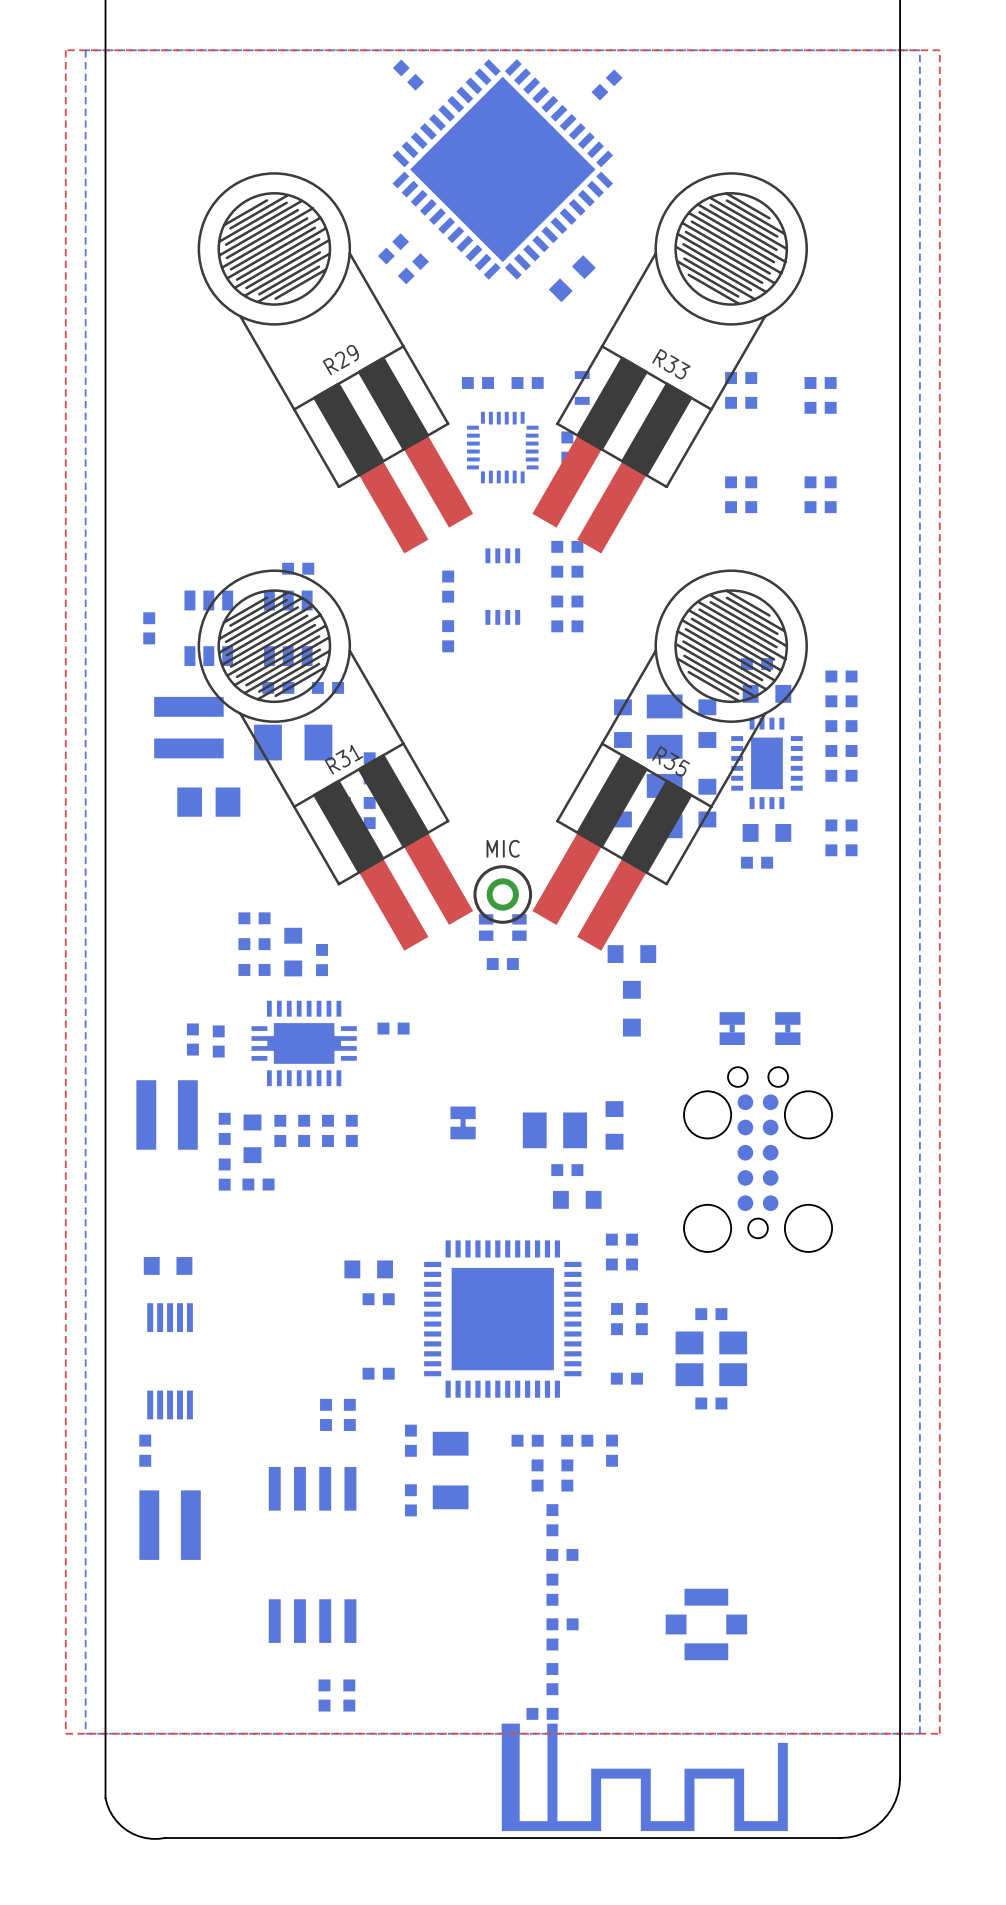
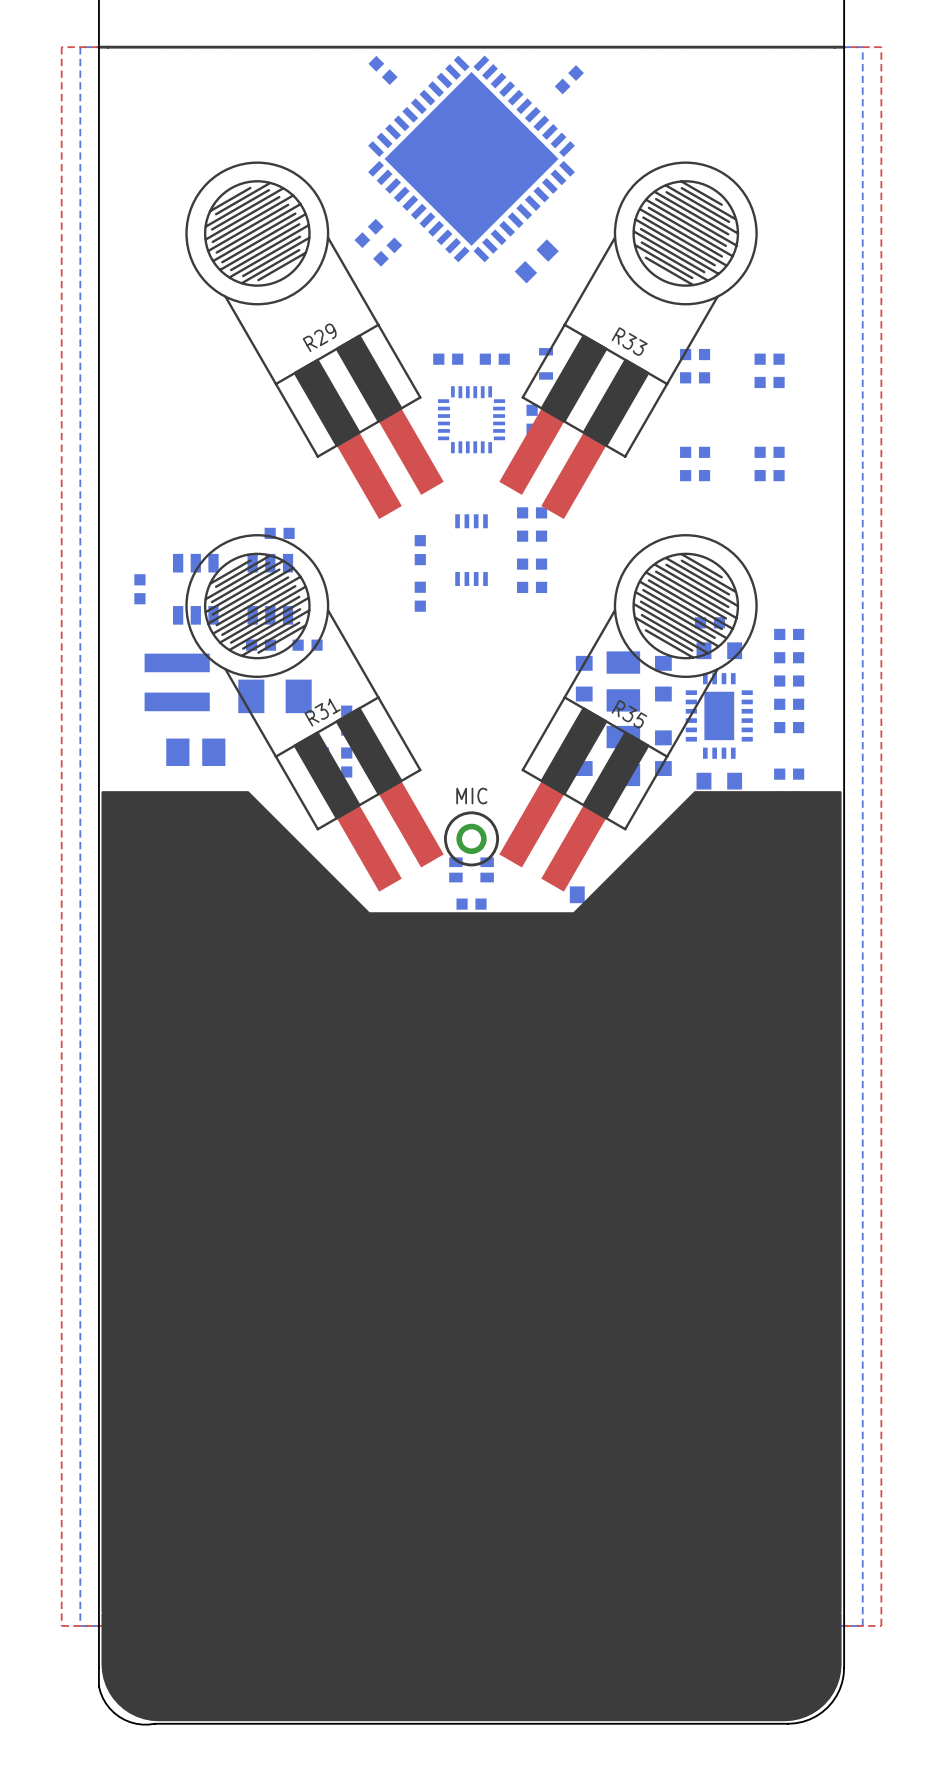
line: none -> (98, 47) (844, 47)
drawing: none -> [101, 791, 842, 1722]

